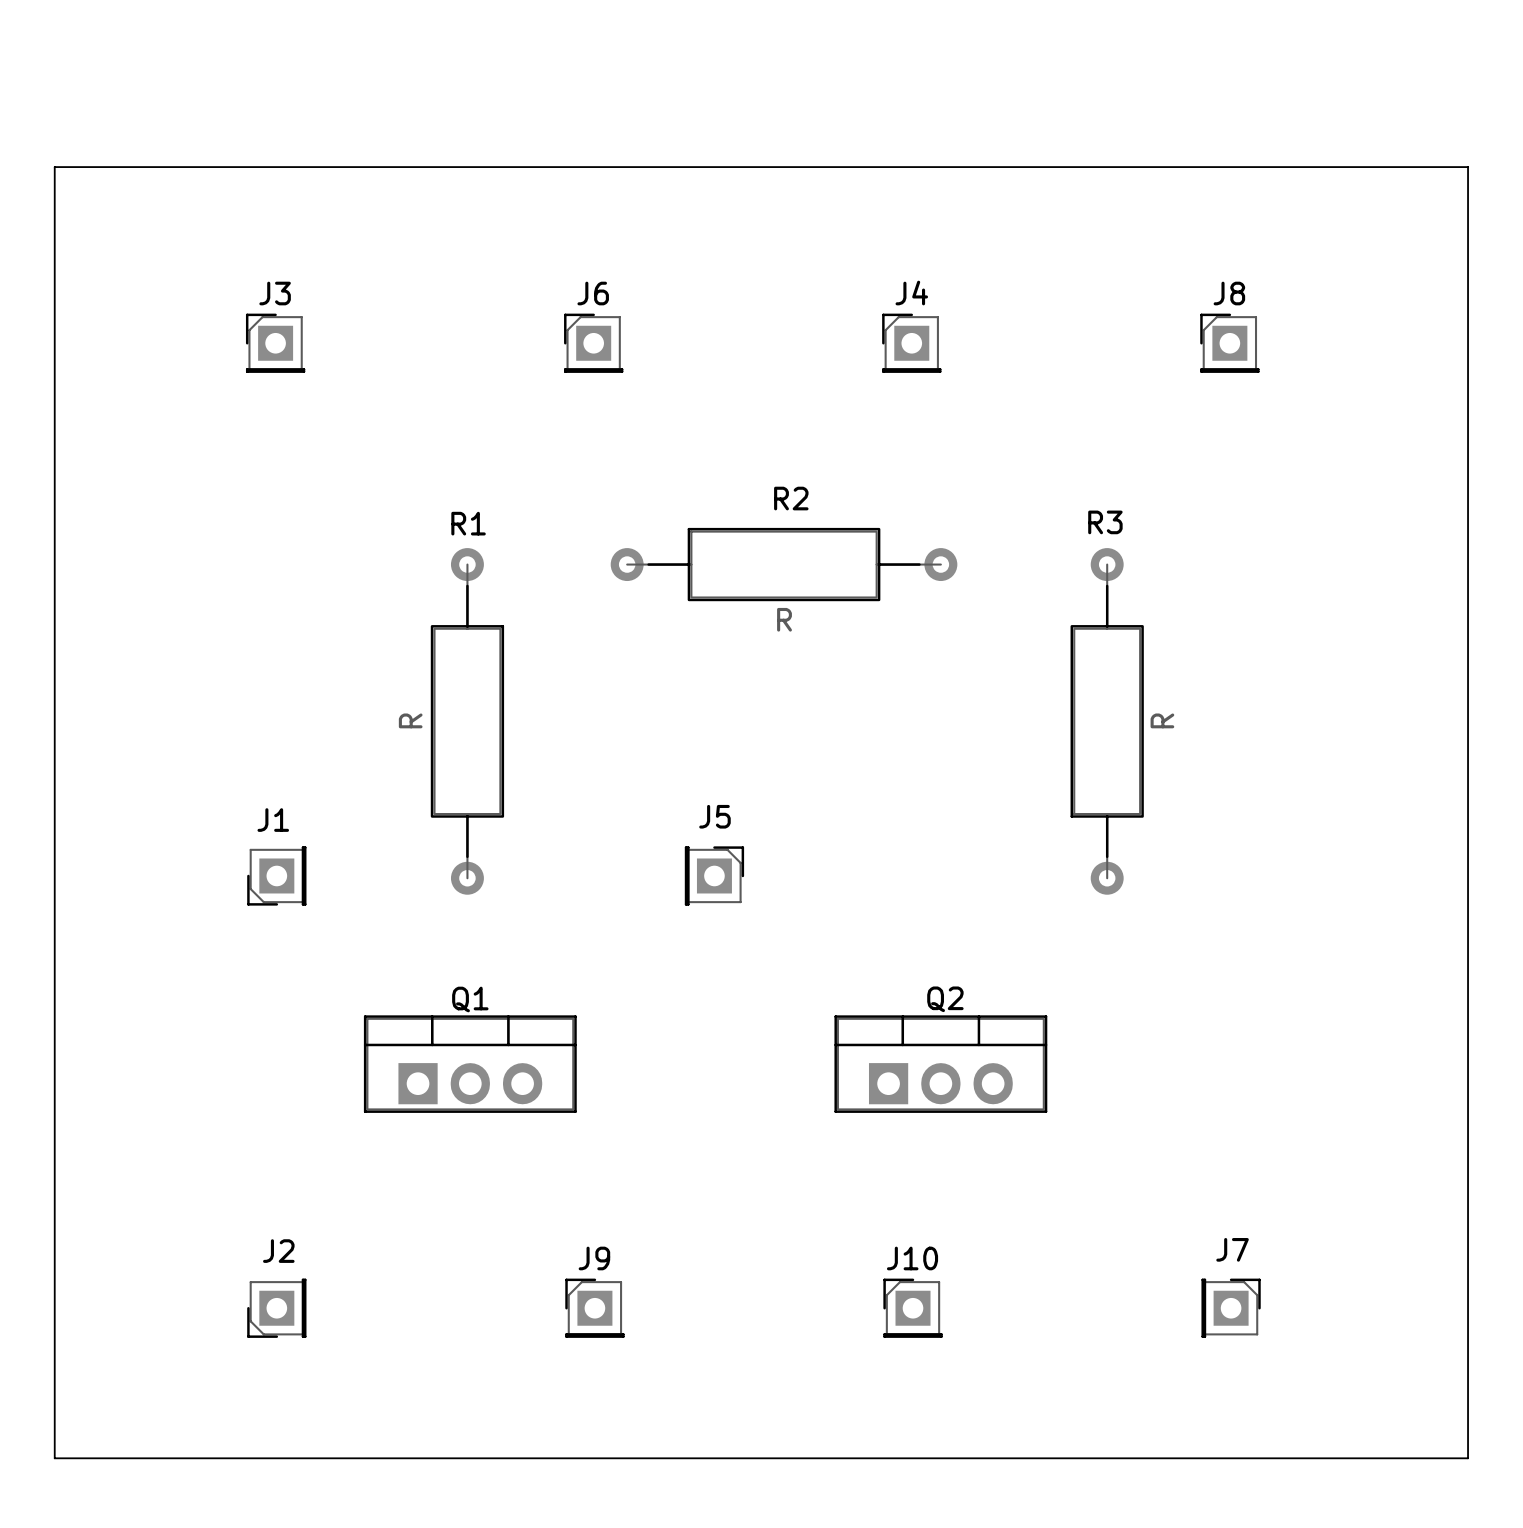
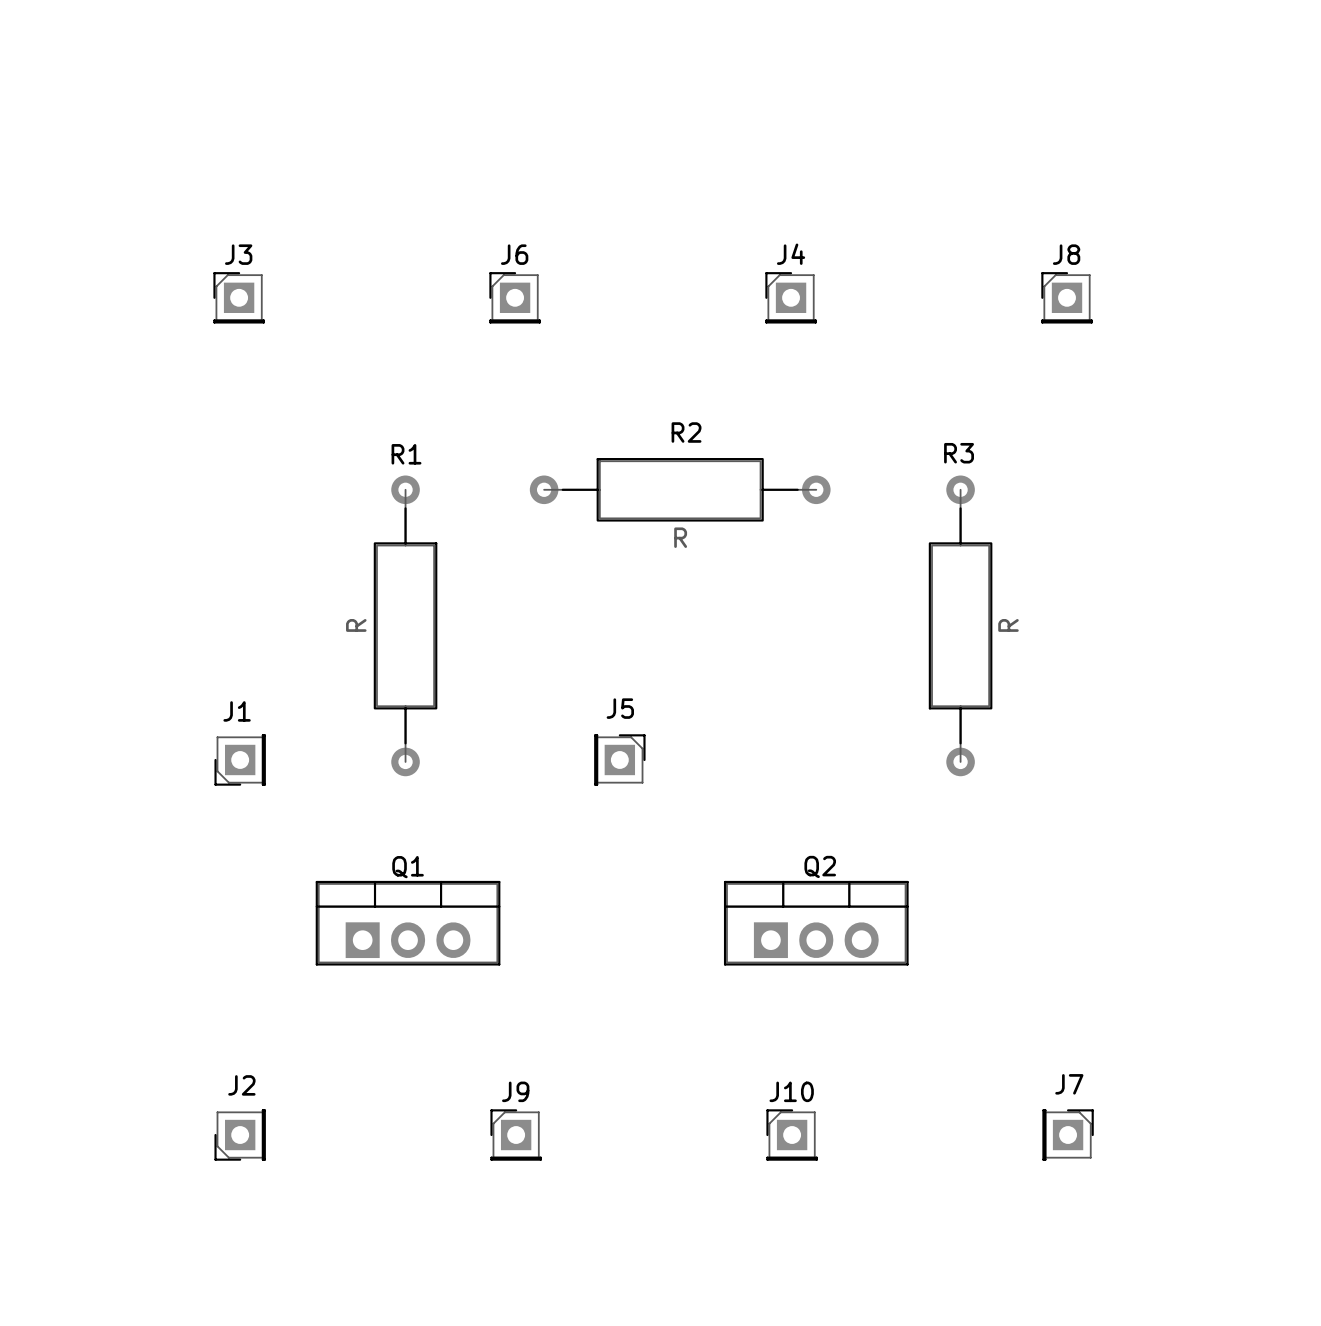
board edge: (54, 167) (1468, 167) (1468, 1458) (54, 1458) (54, 167) -> none

